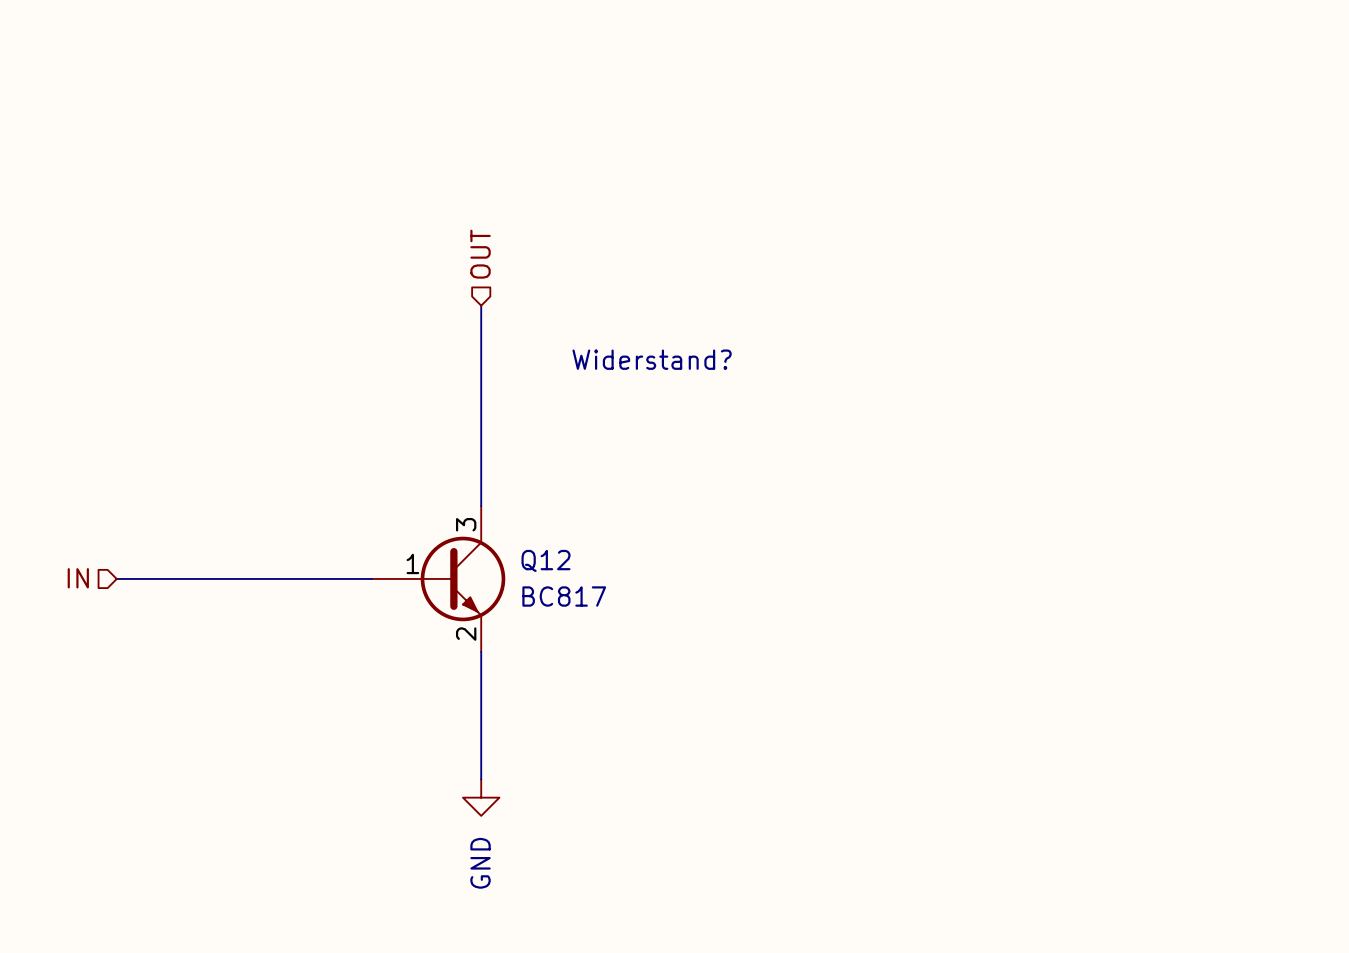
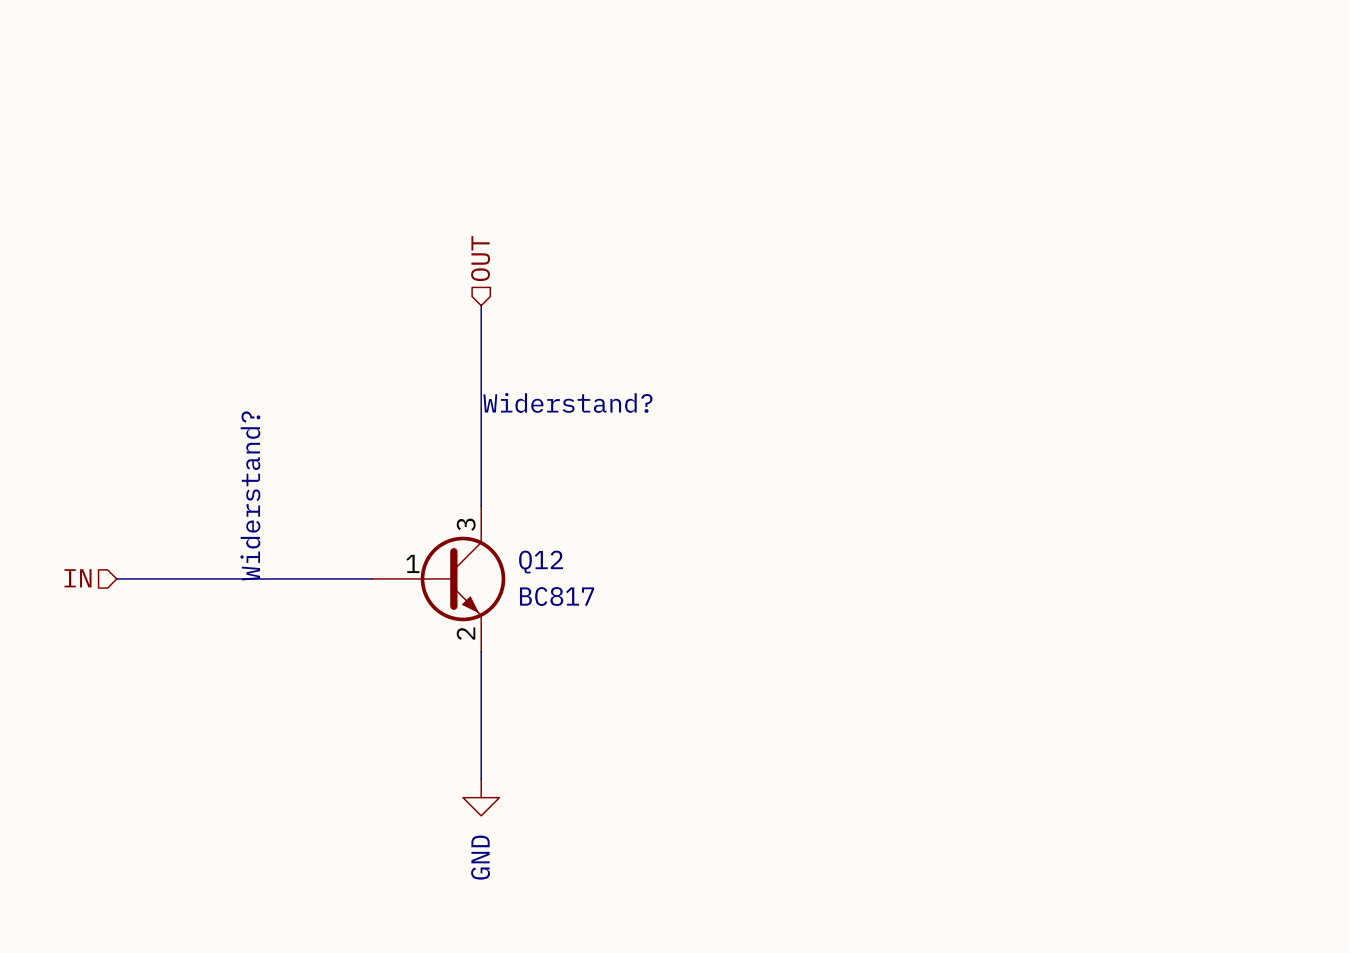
text position: Widerstand? (652, 359) -> Widerstand? (567, 402)
text: none -> Widerstand? (250, 495)

